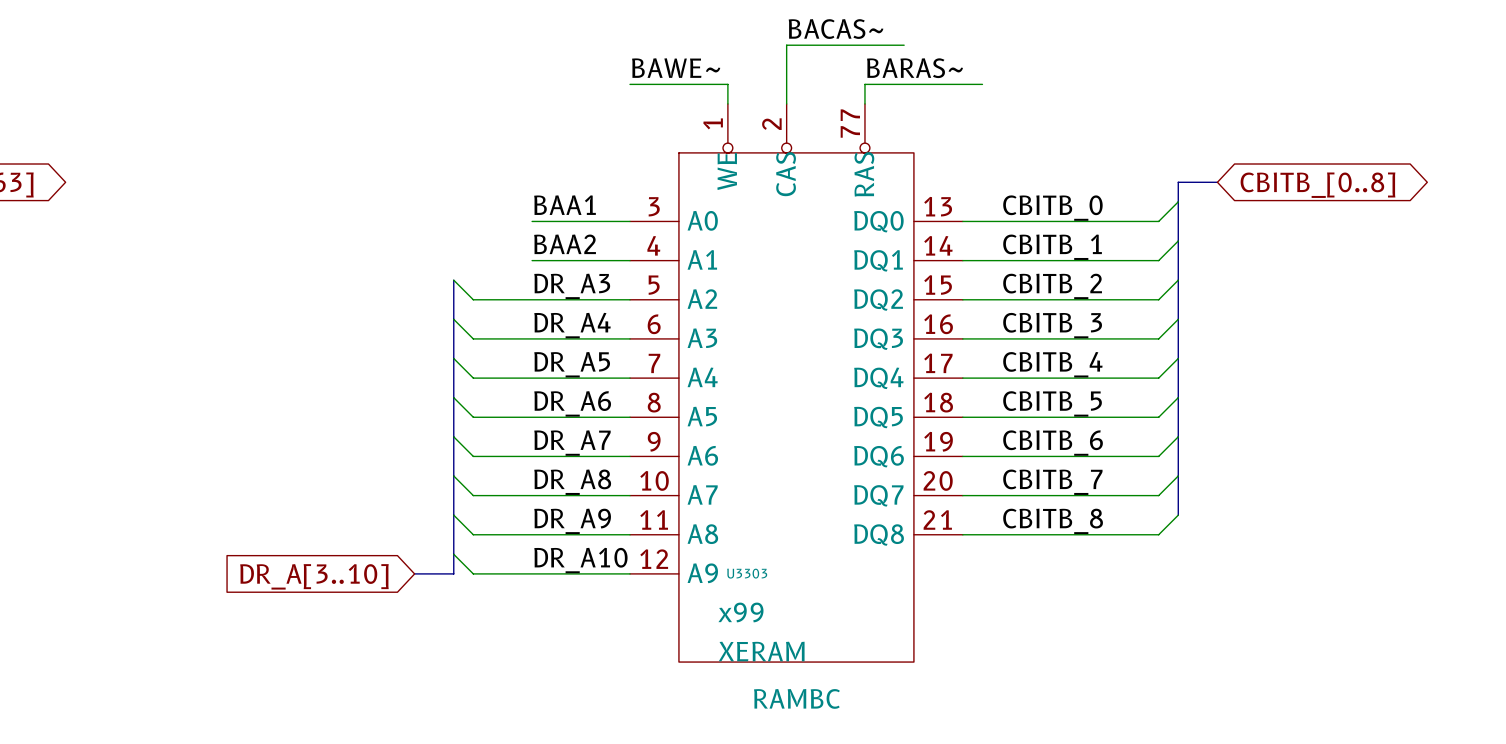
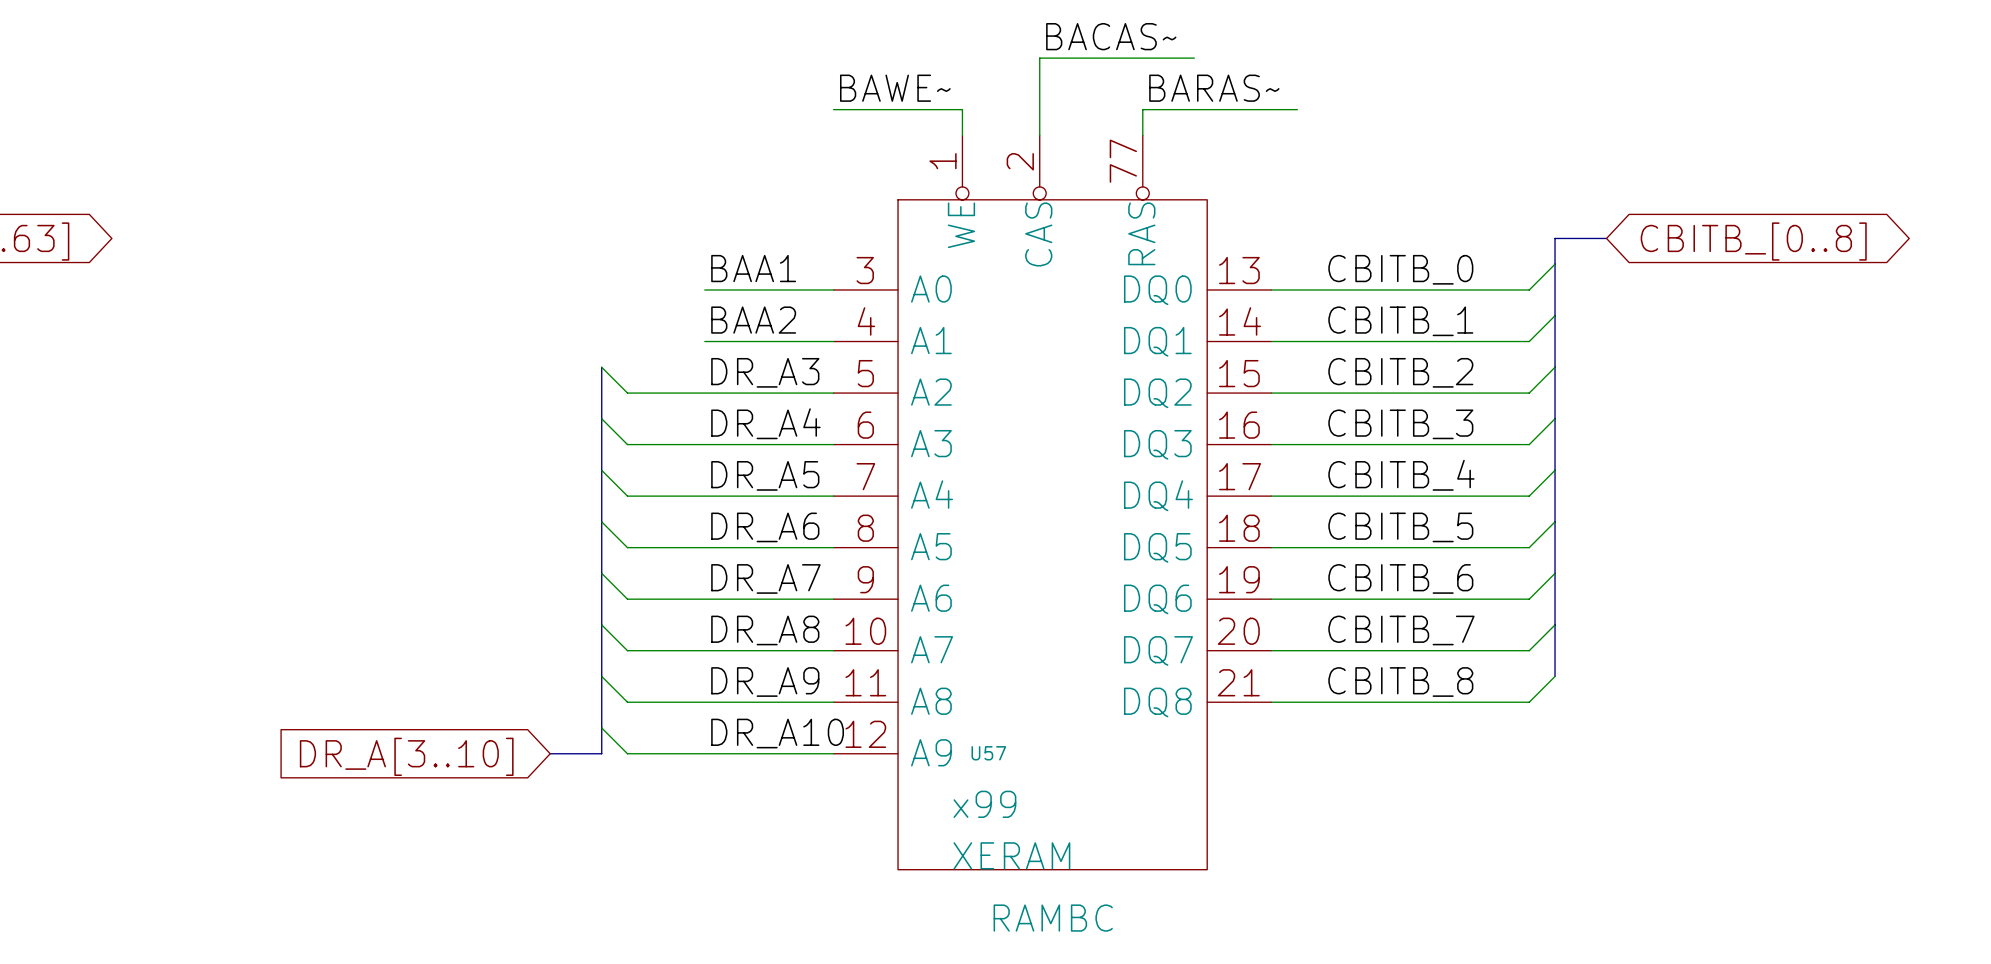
U3303 name: U3303 (747, 573) -> U57 (988, 753)

